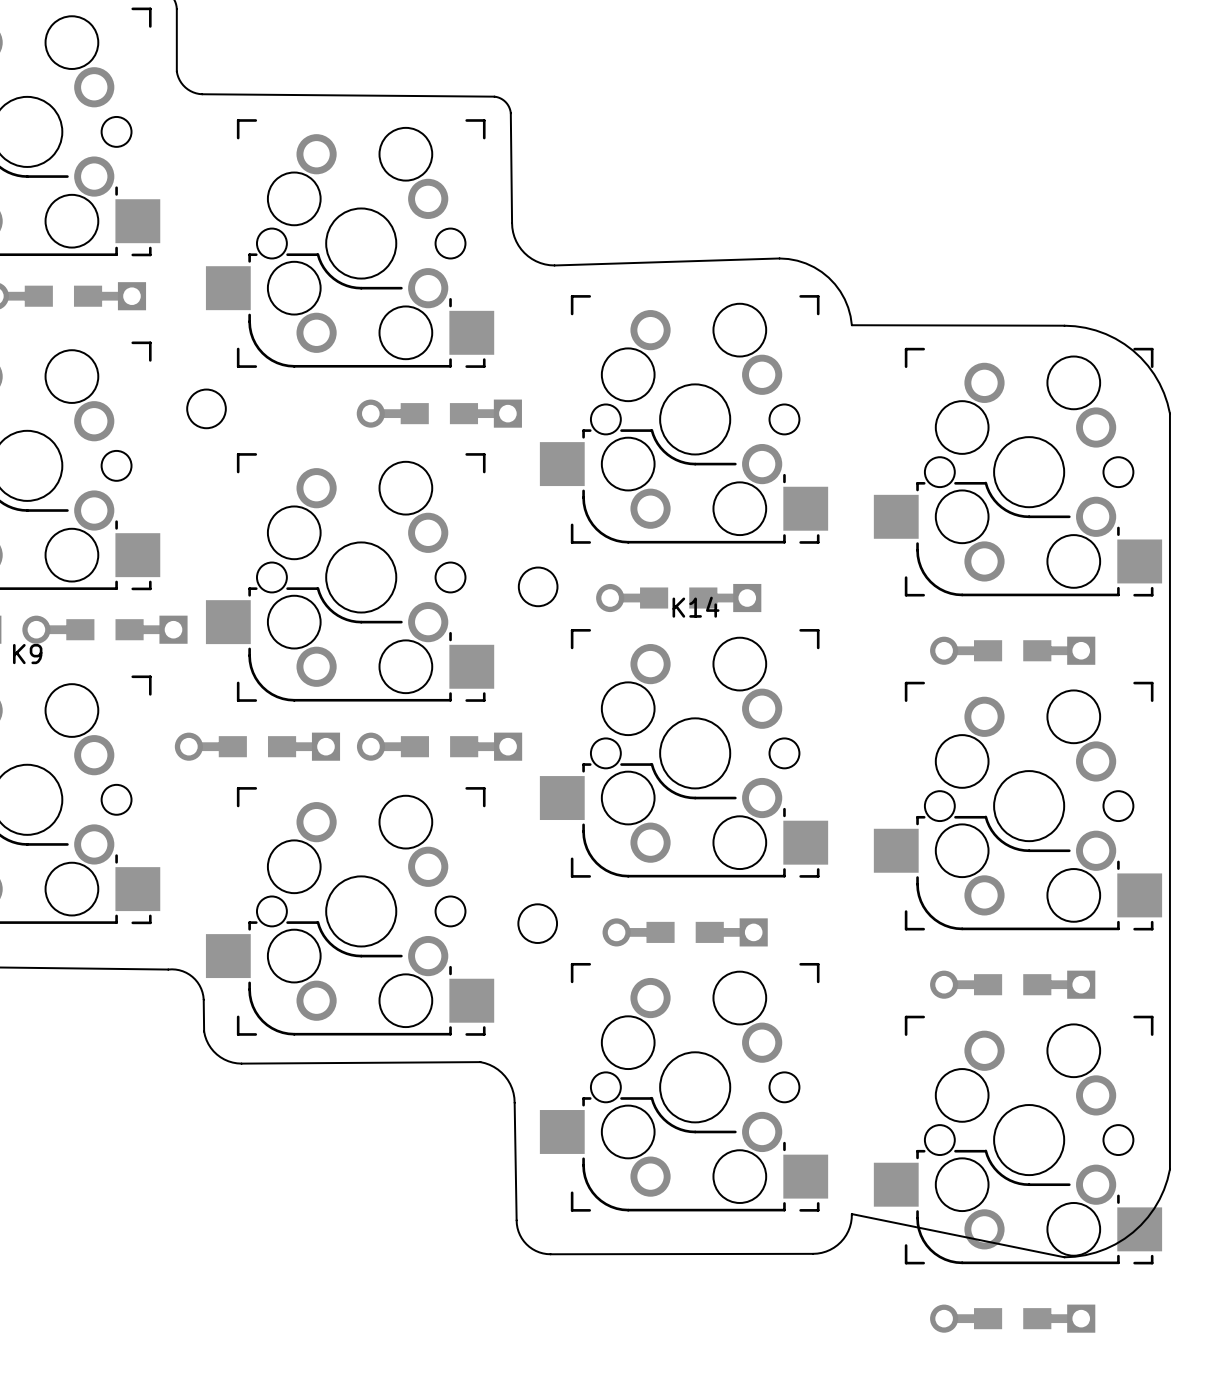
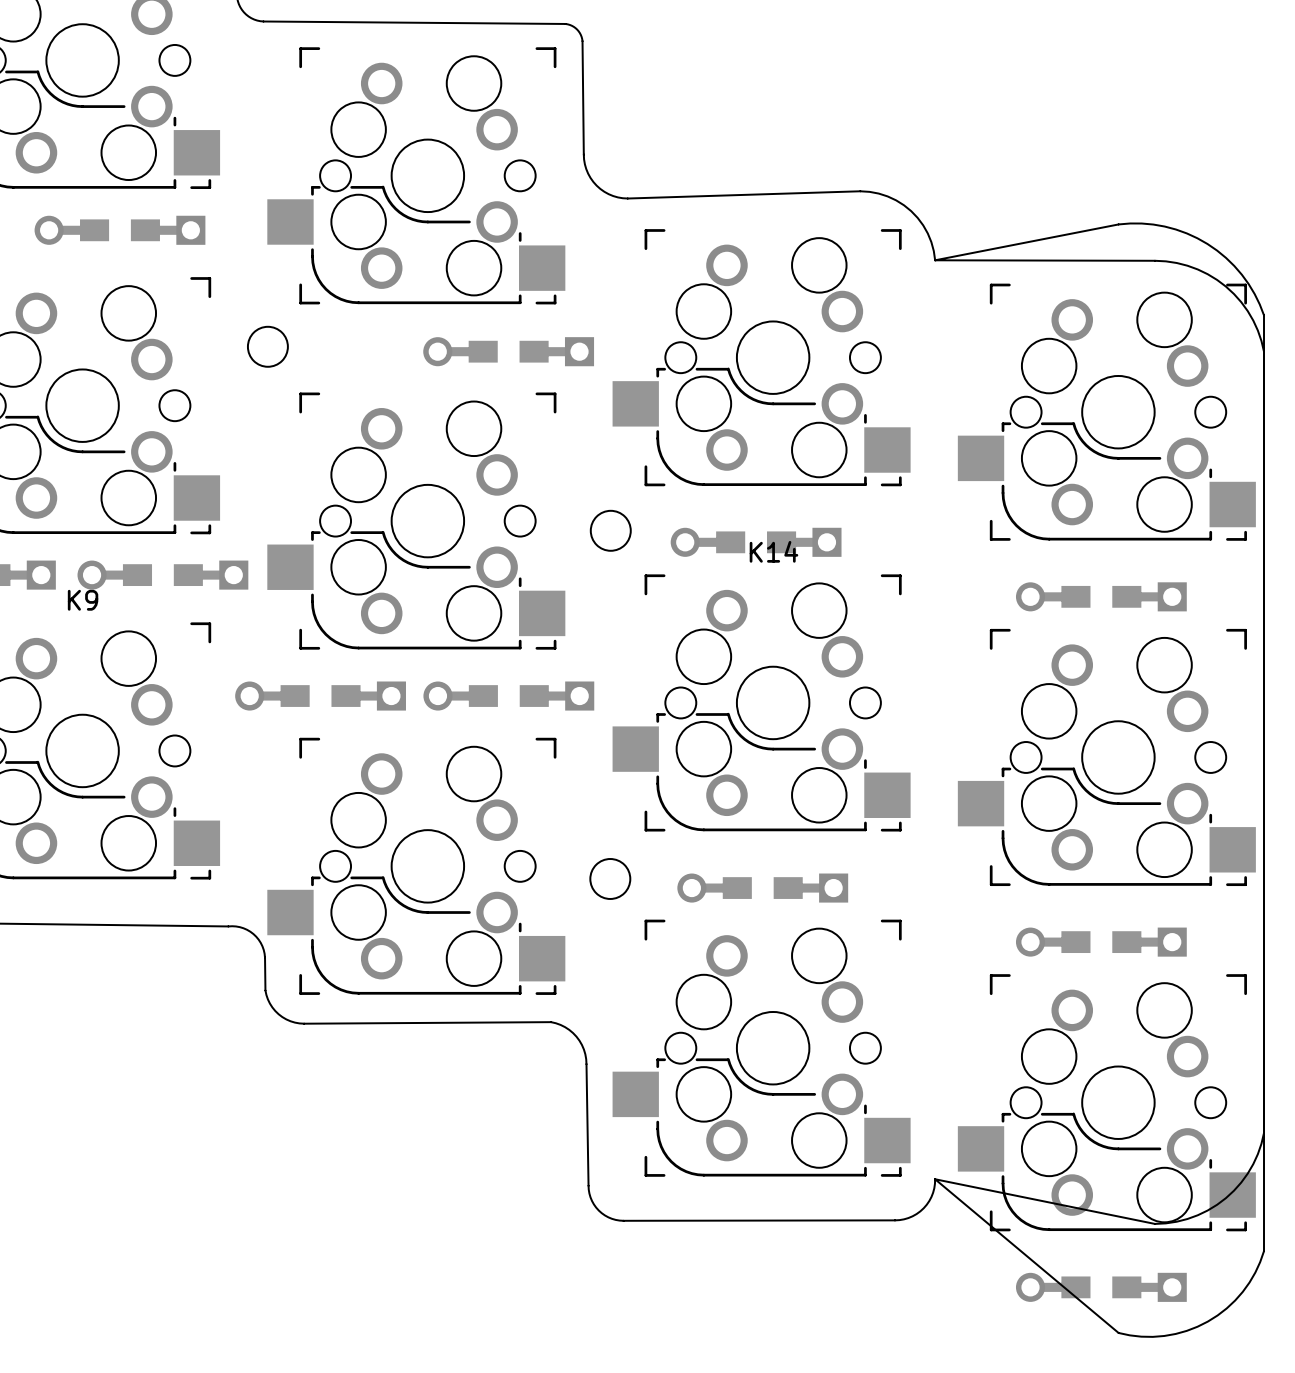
board edge: none -> (935, 260) (1118, 224) (1153, 224) (1175, 229) (1197, 238) (1217, 250) (1234, 265) (1248, 284) (1264, 315) (1264, 351)
board edge: none -> (1264, 1133) (1264, 1251) (1255, 1272) (1235, 1300) (1217, 1315) (1186, 1330) (1164, 1335) (1141, 1336) (1118, 1332) (935, 1179)

